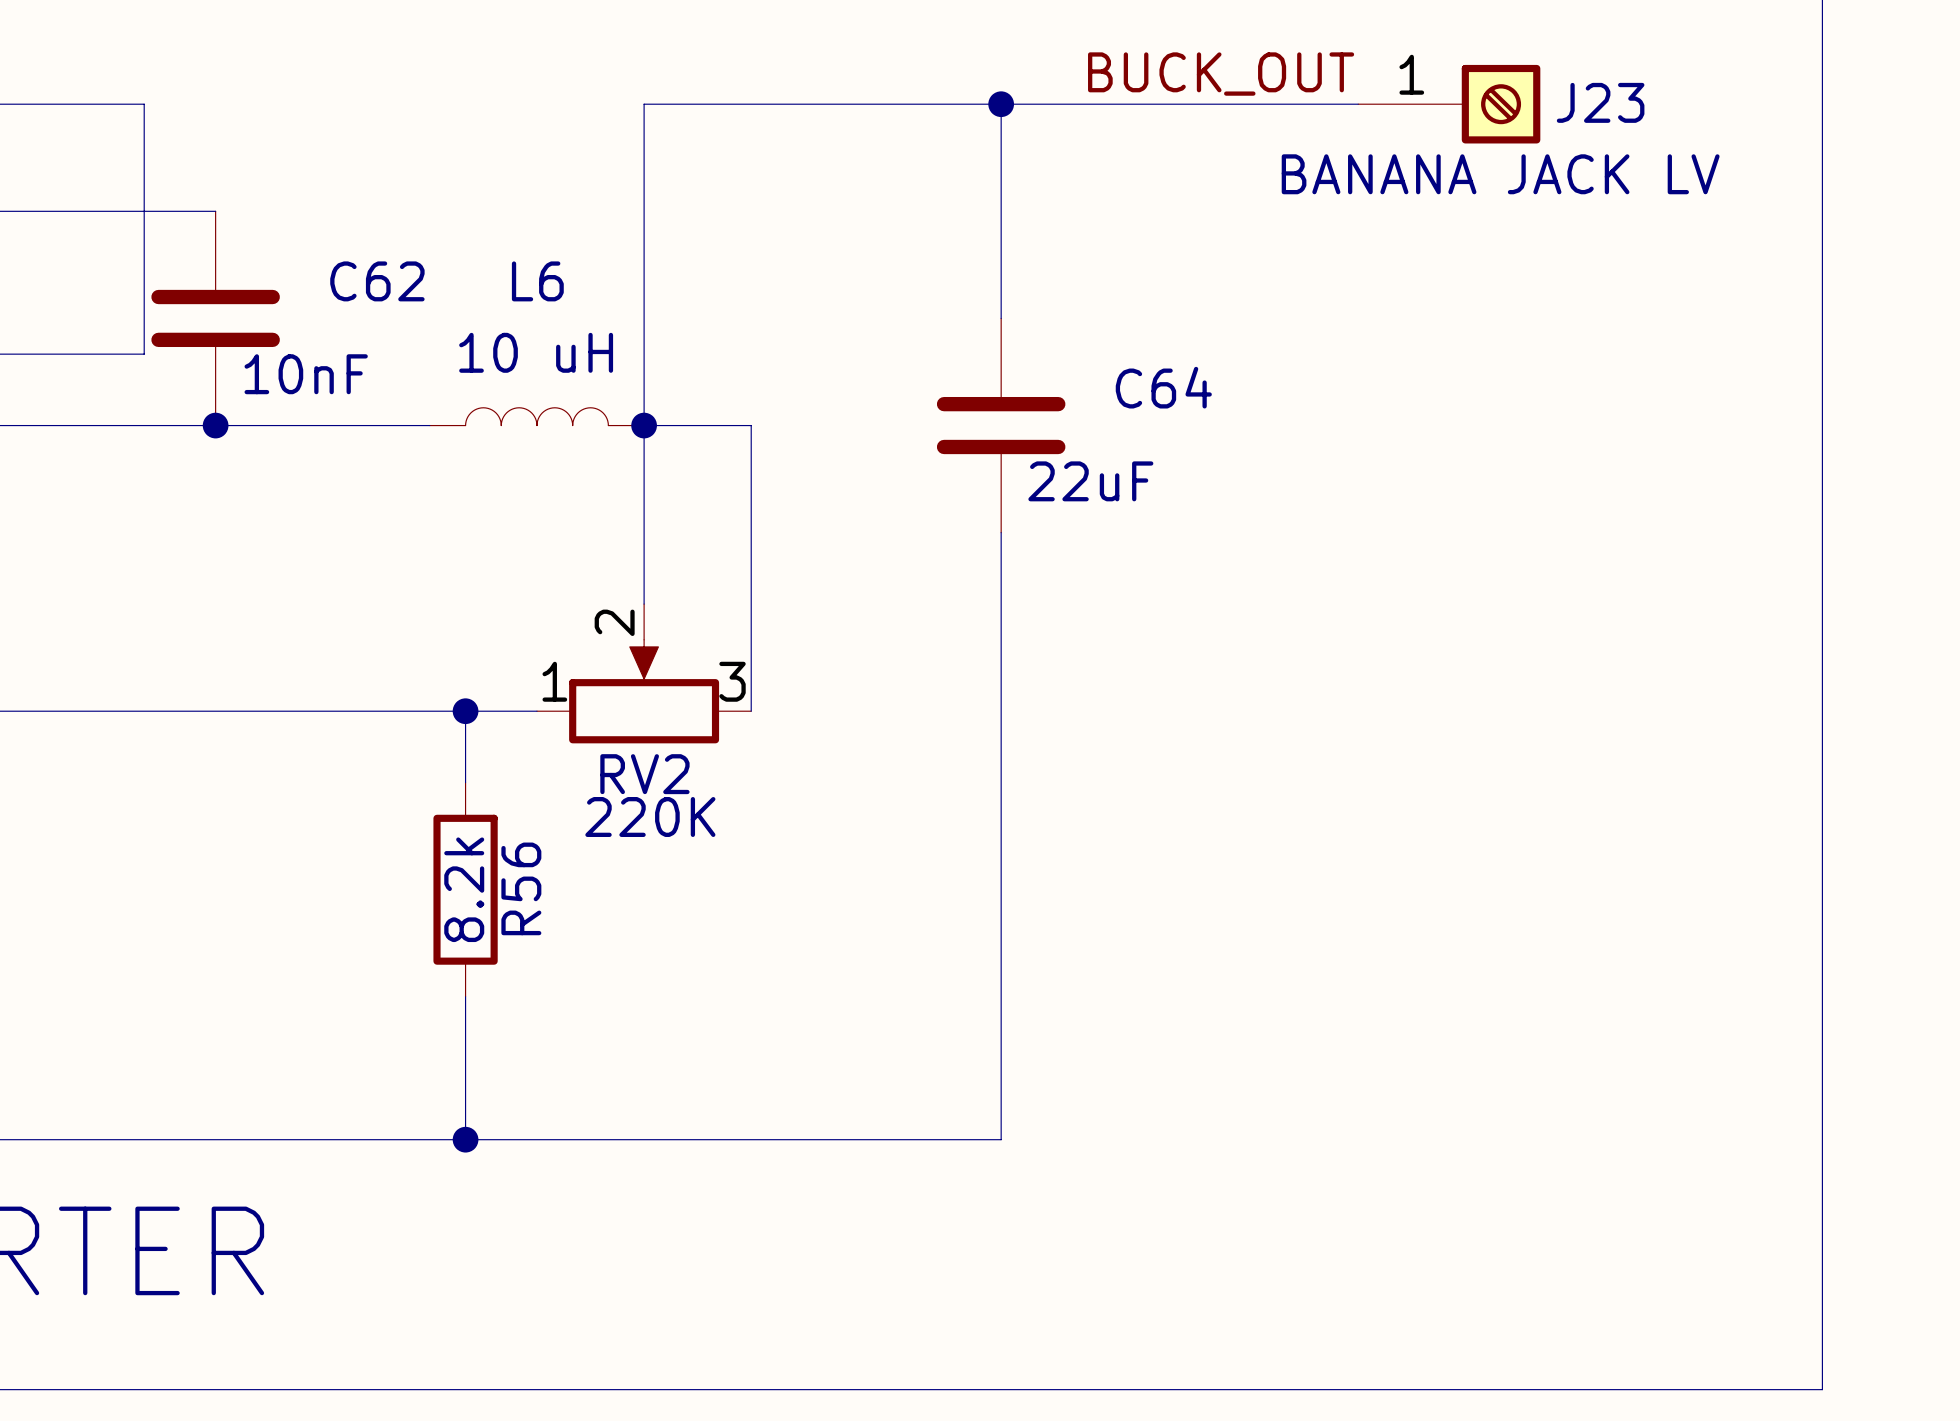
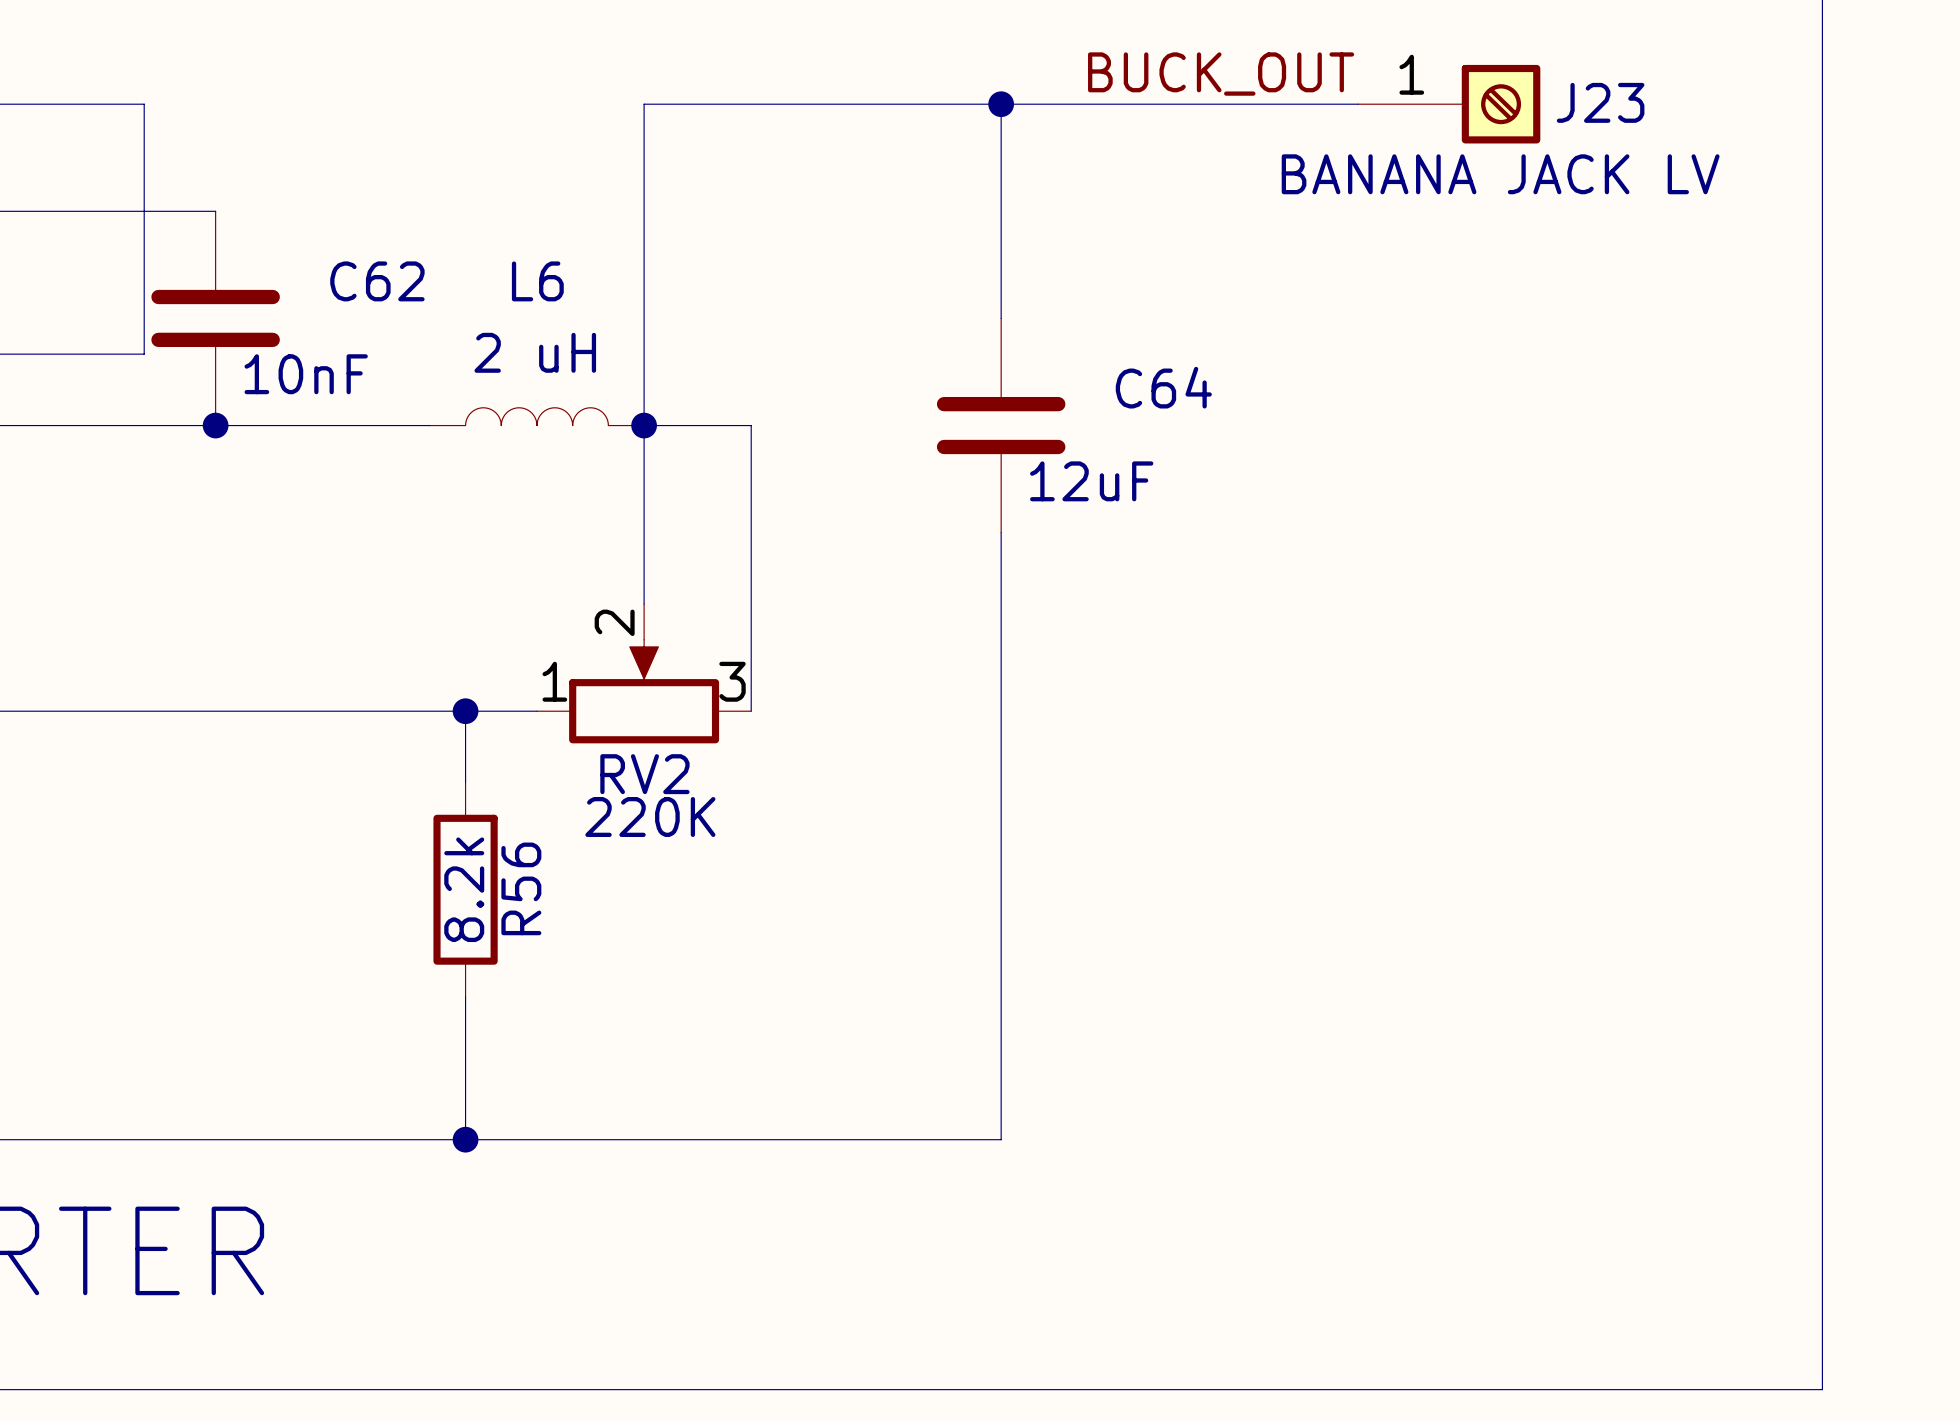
L6 value: 10 uH (536, 352) -> 2 uH (535, 352)
C64 value: 22uF (1090, 481) -> 12uF (1091, 481)

